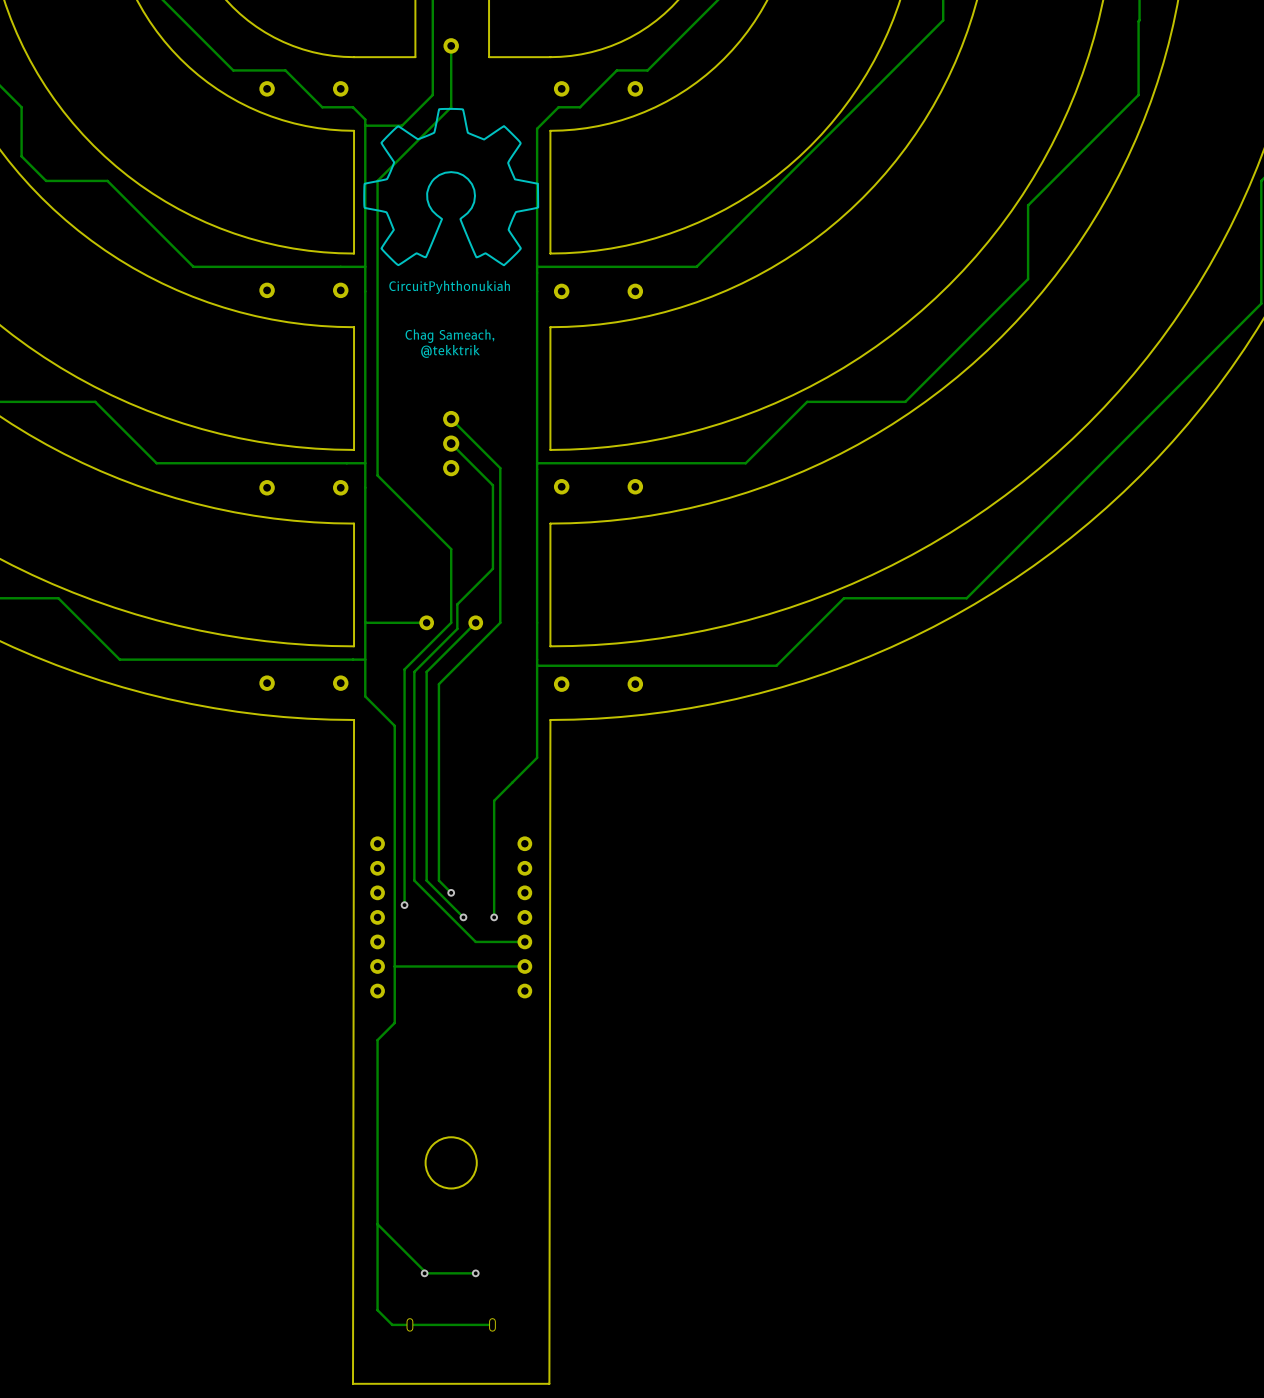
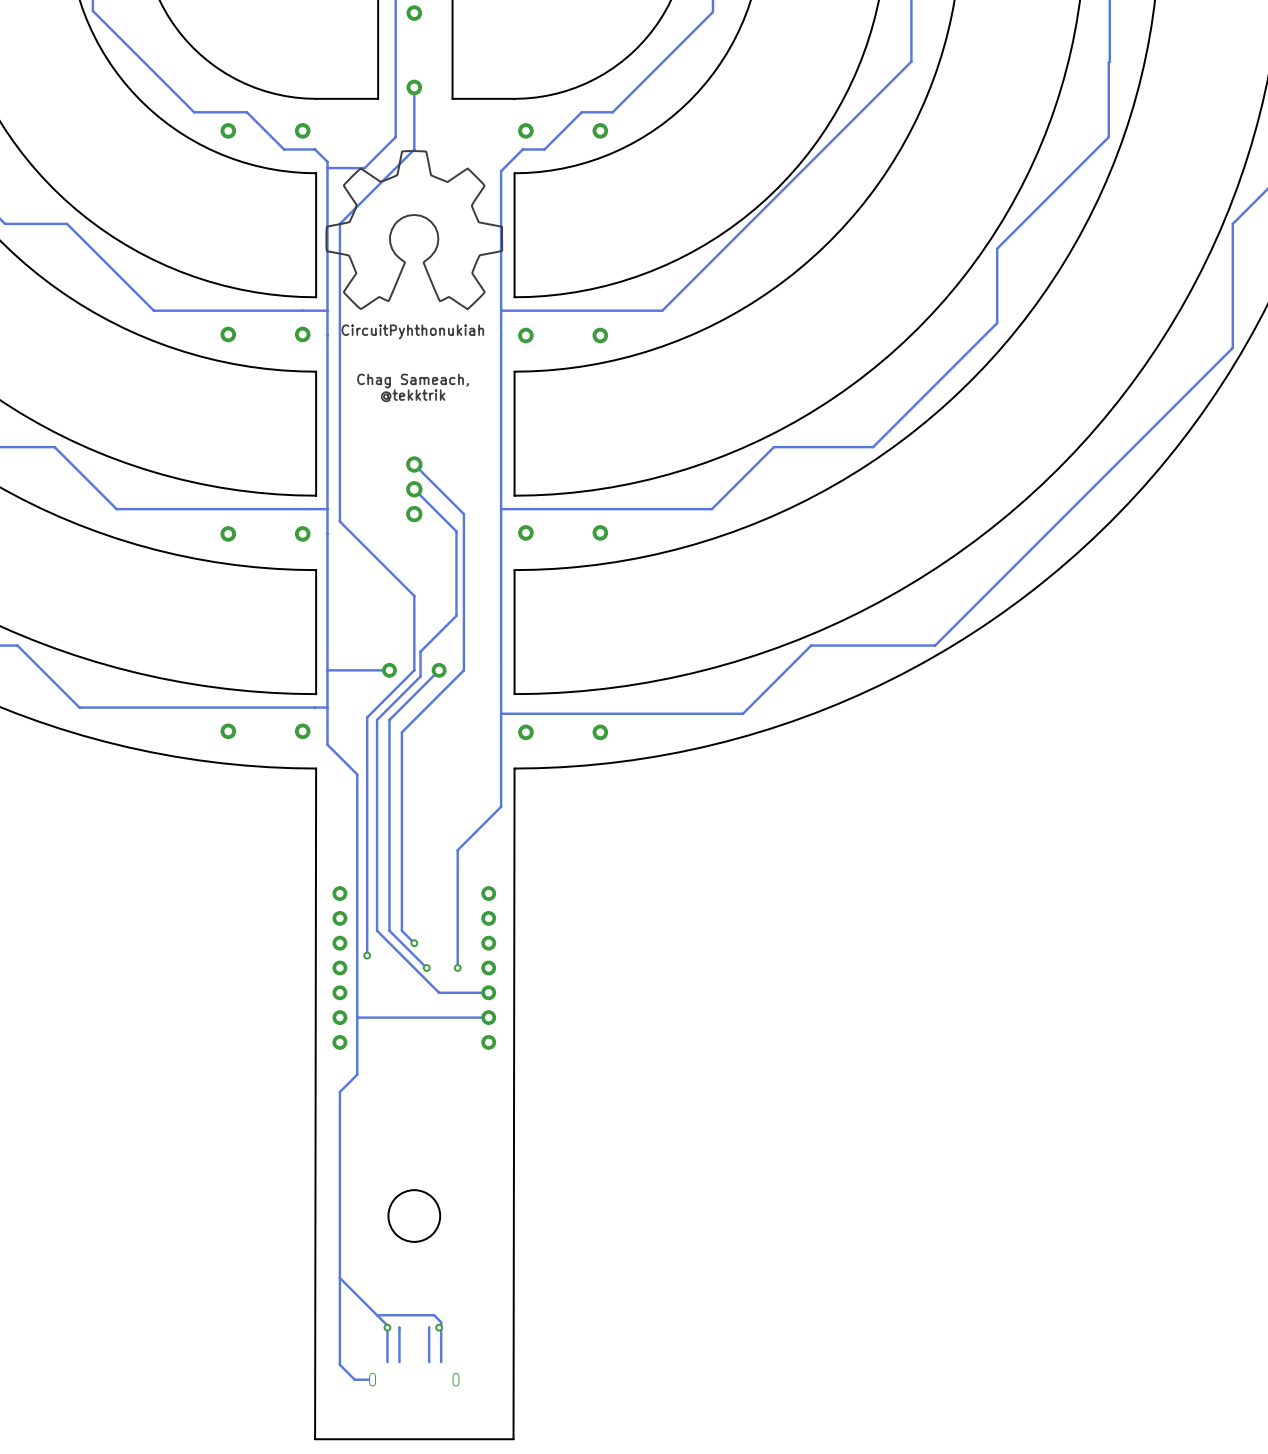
track: none -> (377, 1315) (434, 1315) (441, 1322) (441, 1362)
track: none -> (399, 1327) (399, 1362)
track: none -> (429, 1327) (429, 1362)
track: (475, 1273) (424, 1273) -> (387, 1362) (387, 1327)
track: (492, 1324) (409, 1324) -> none

